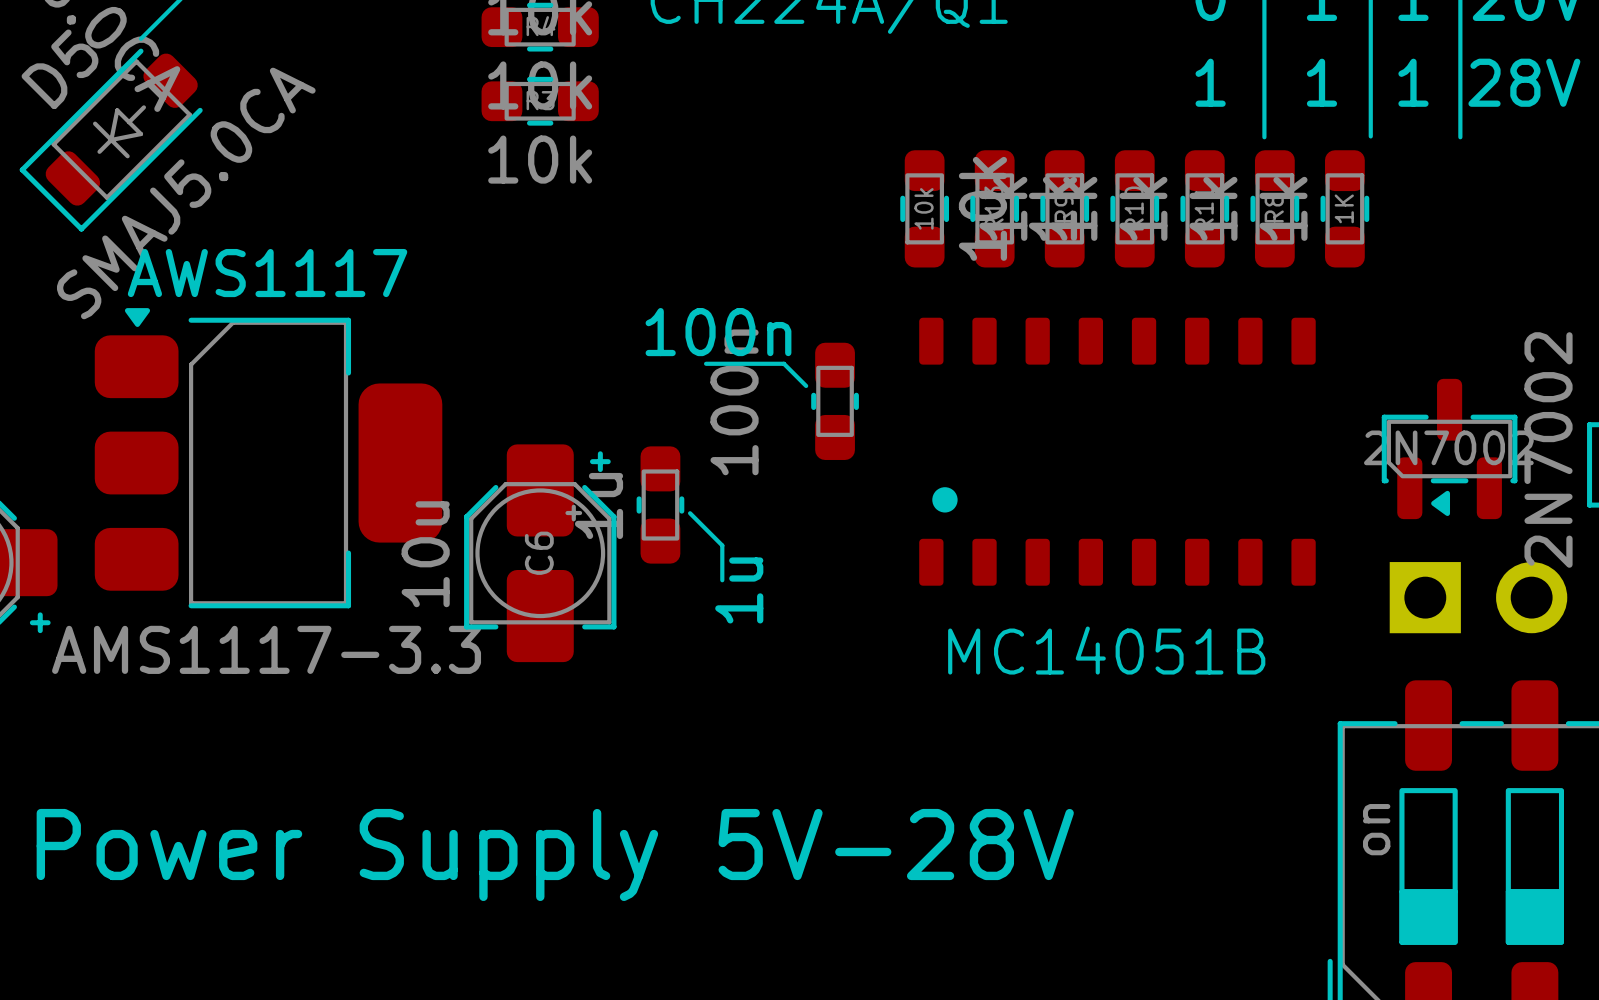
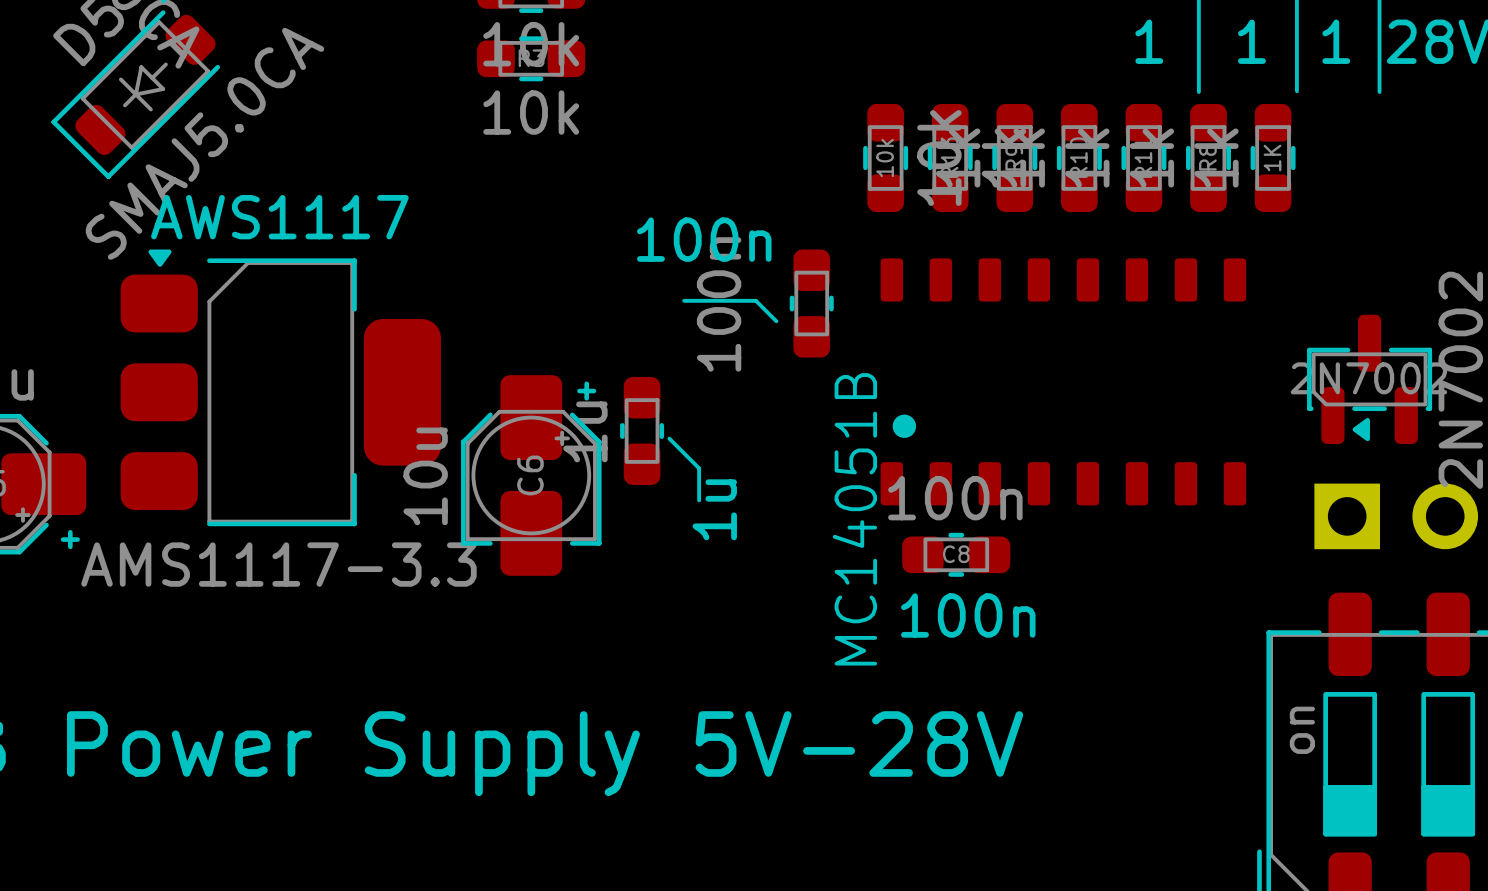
100n position: (835, 401) -> (811, 303)
C8: none -> 100n (956, 554)
MC14051B name rotation: 0° (1106, 650) -> 90° counterclockwise (854, 519)
text: none -> 100n (968, 615)

